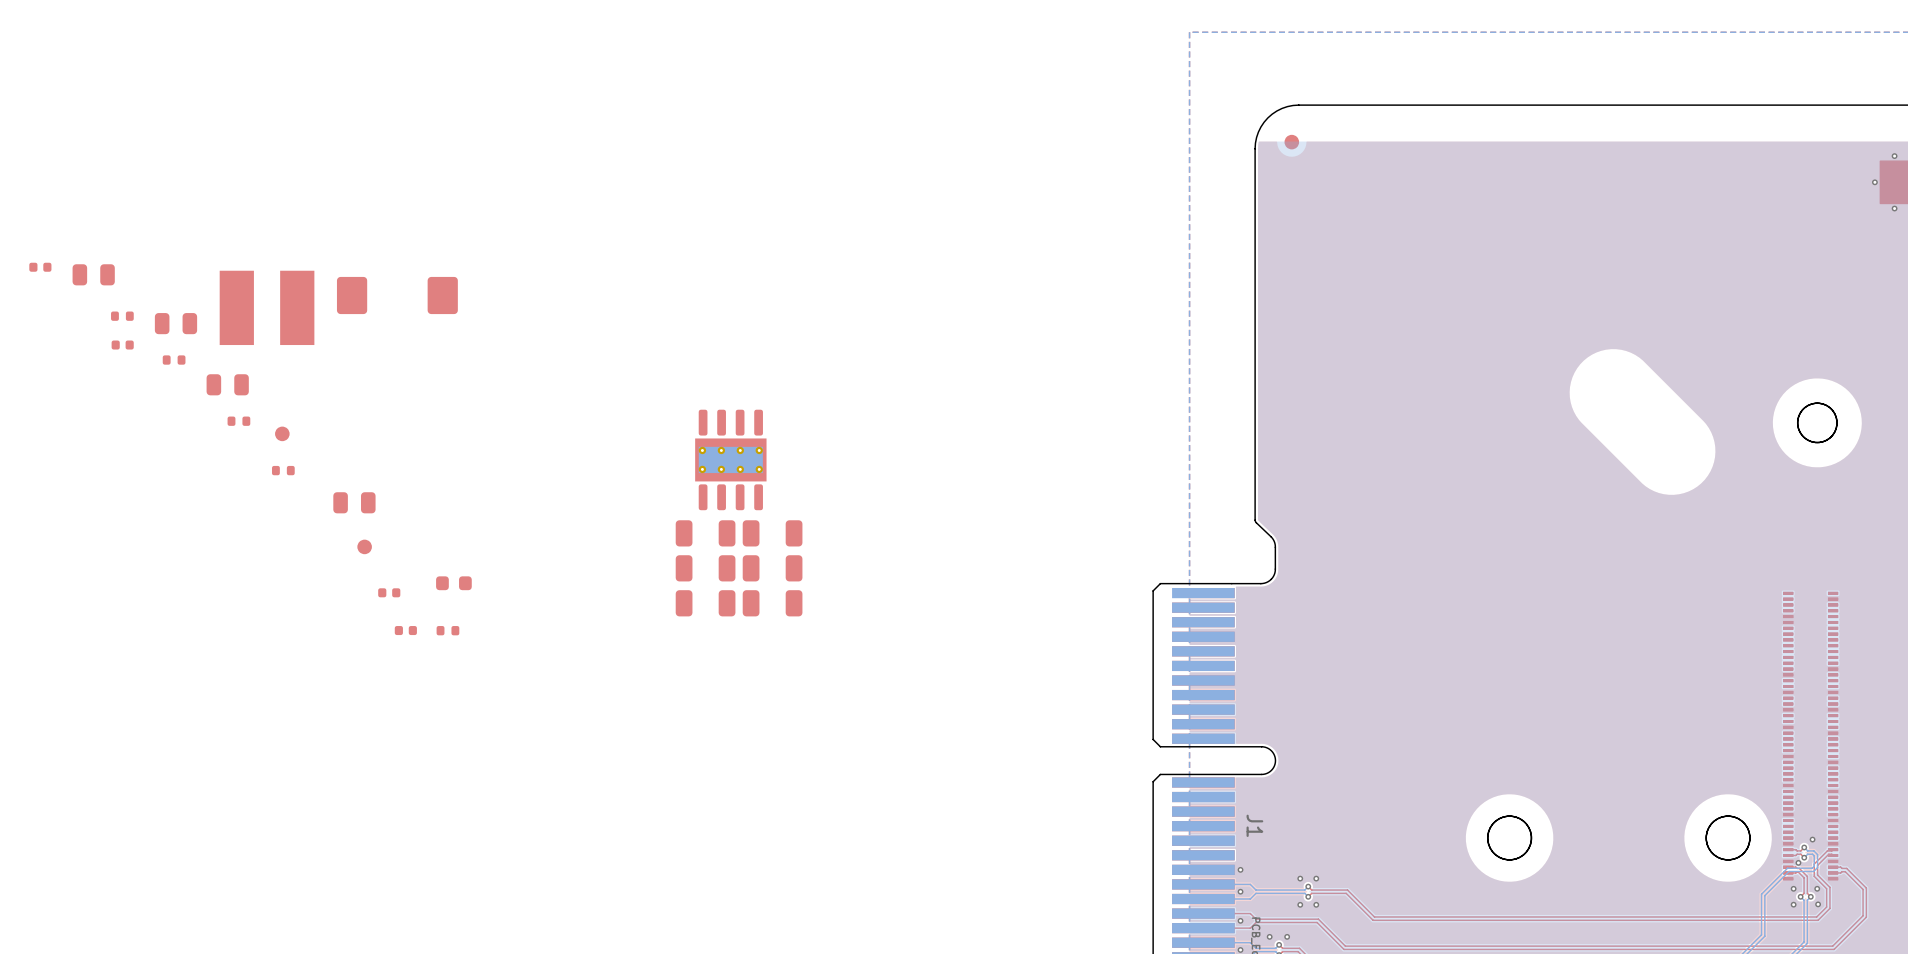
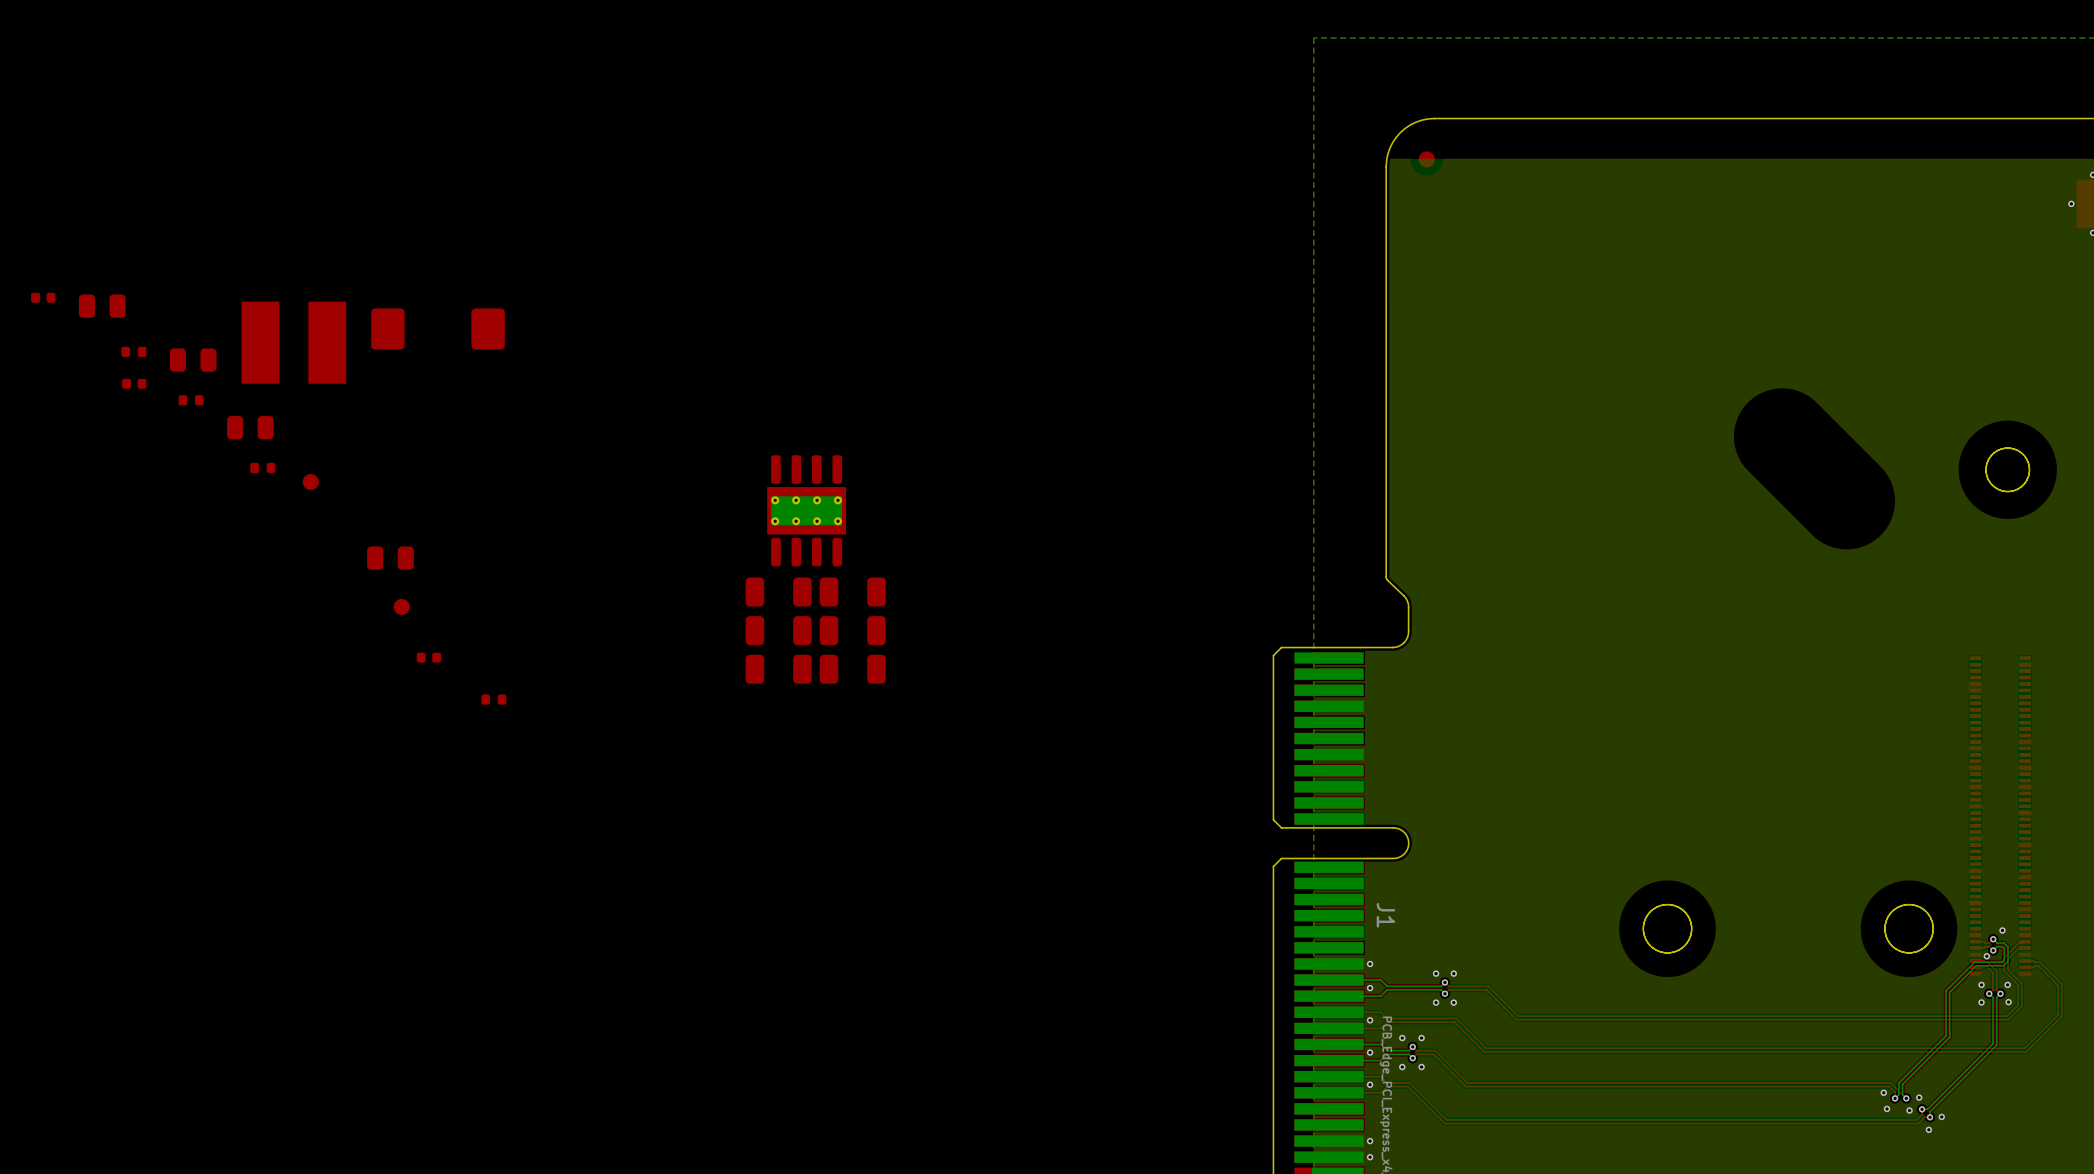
part: (283, 470) -> none
part: (453, 583) -> none
part: (405, 630) -> none

